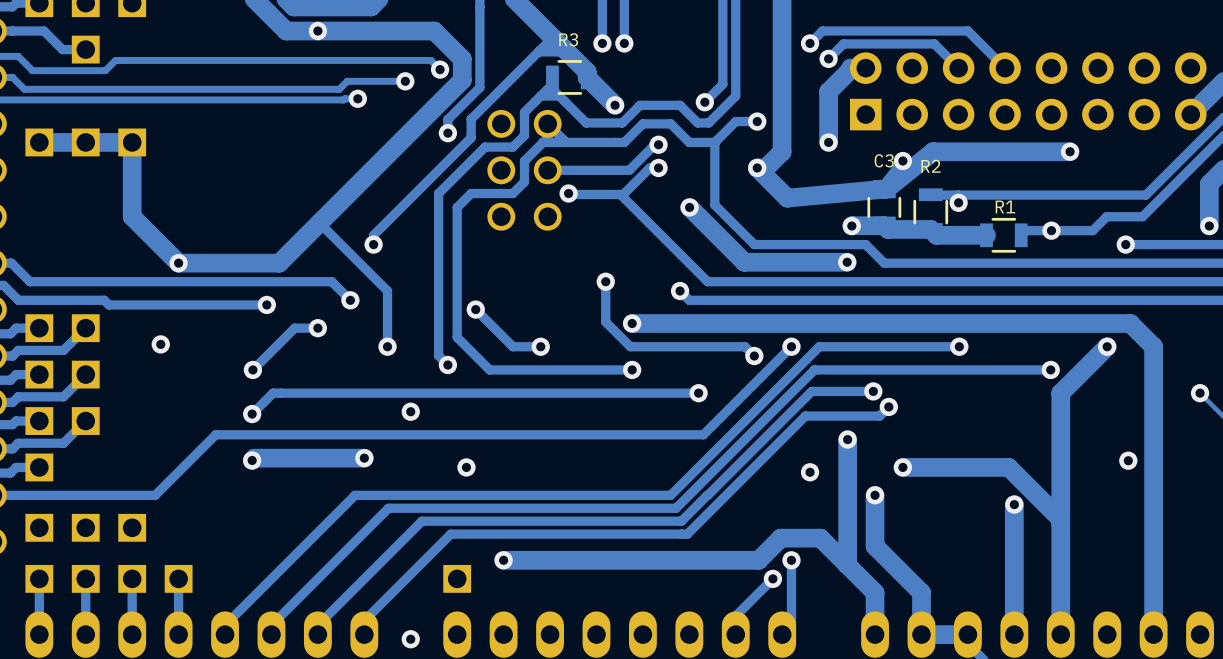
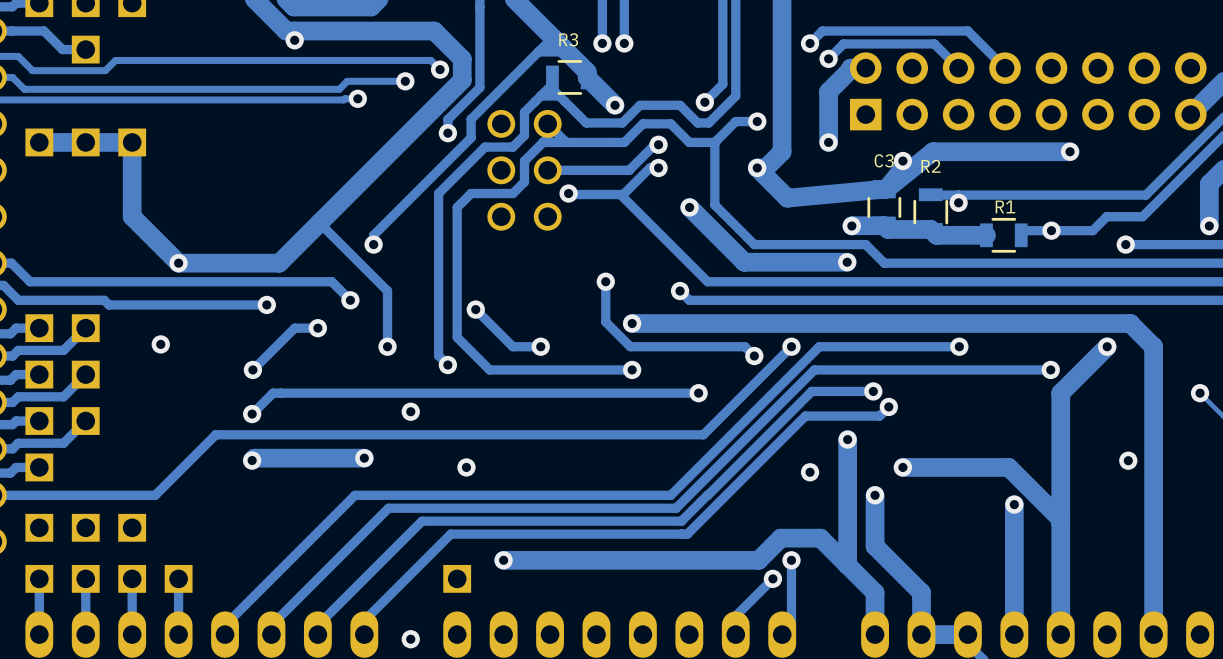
via: (317, 31) -> none
via: none -> (294, 40)

